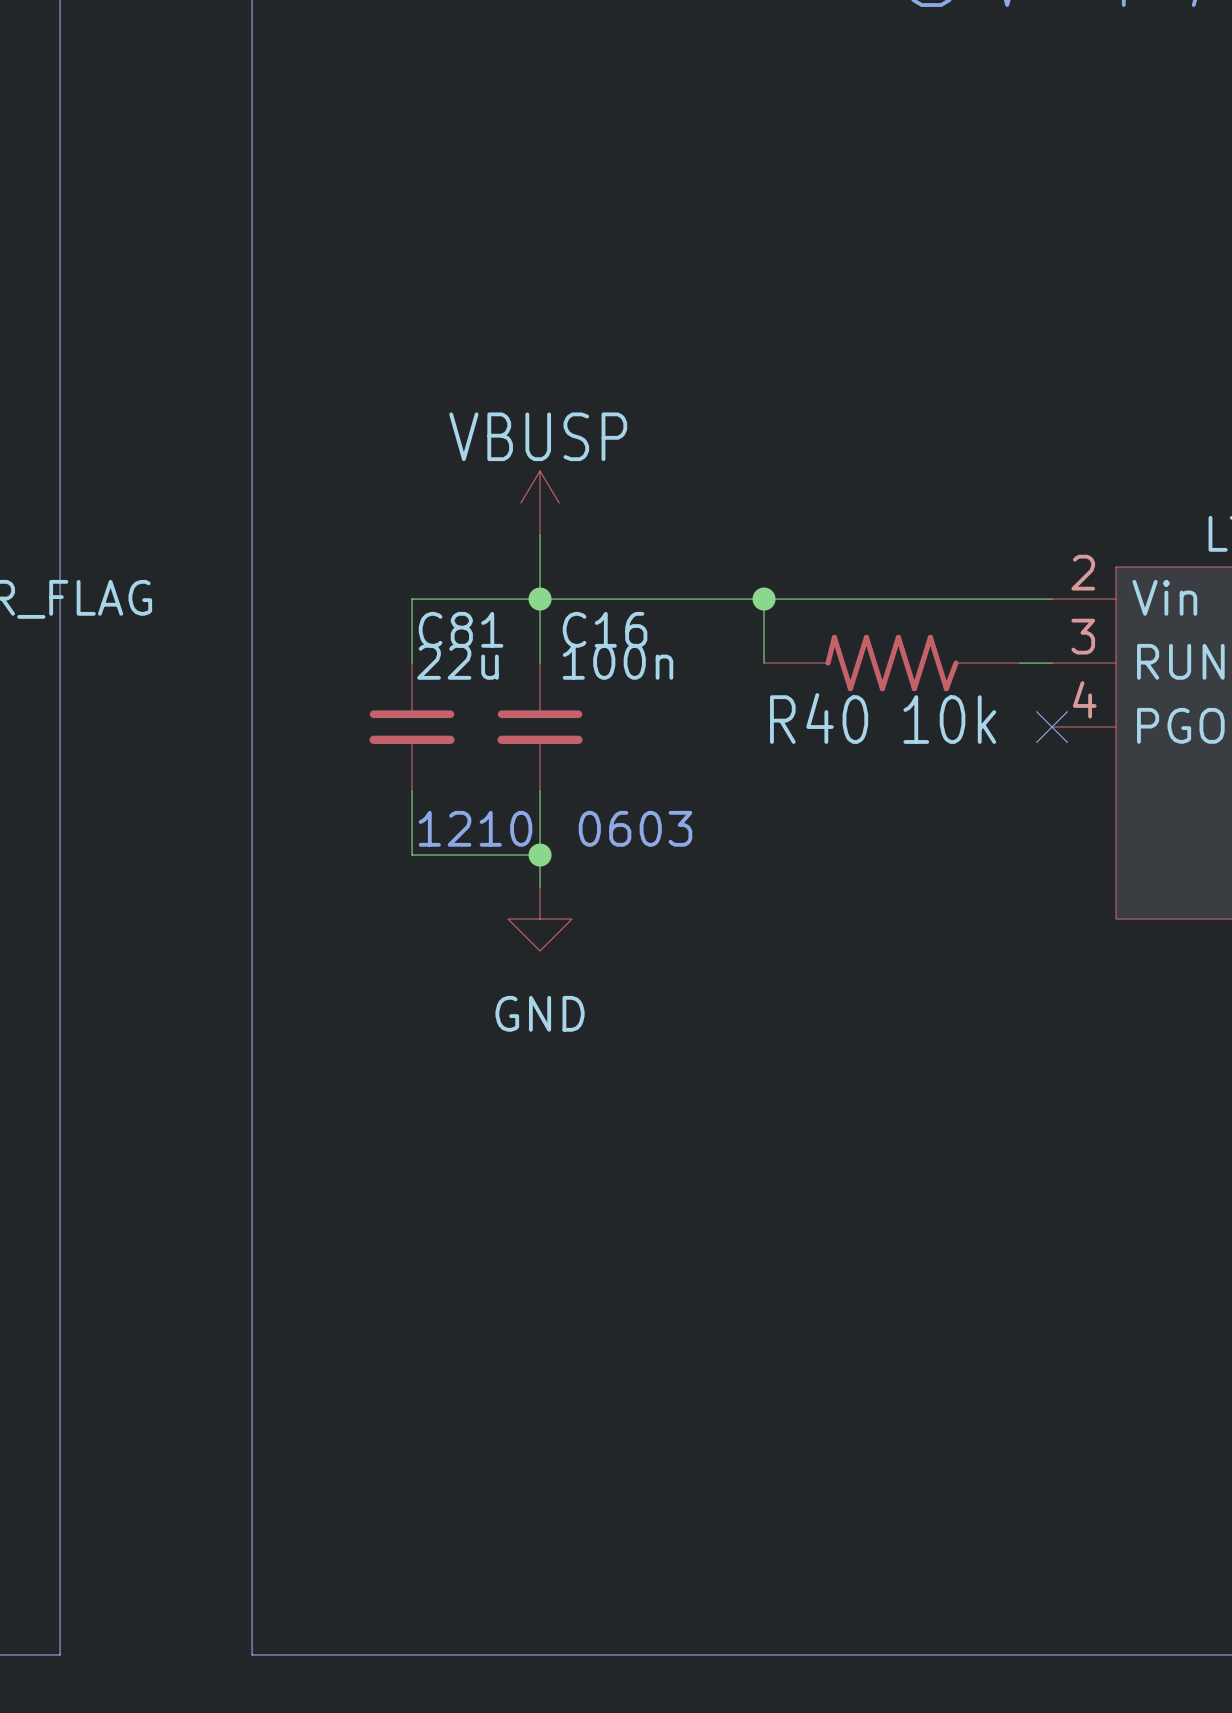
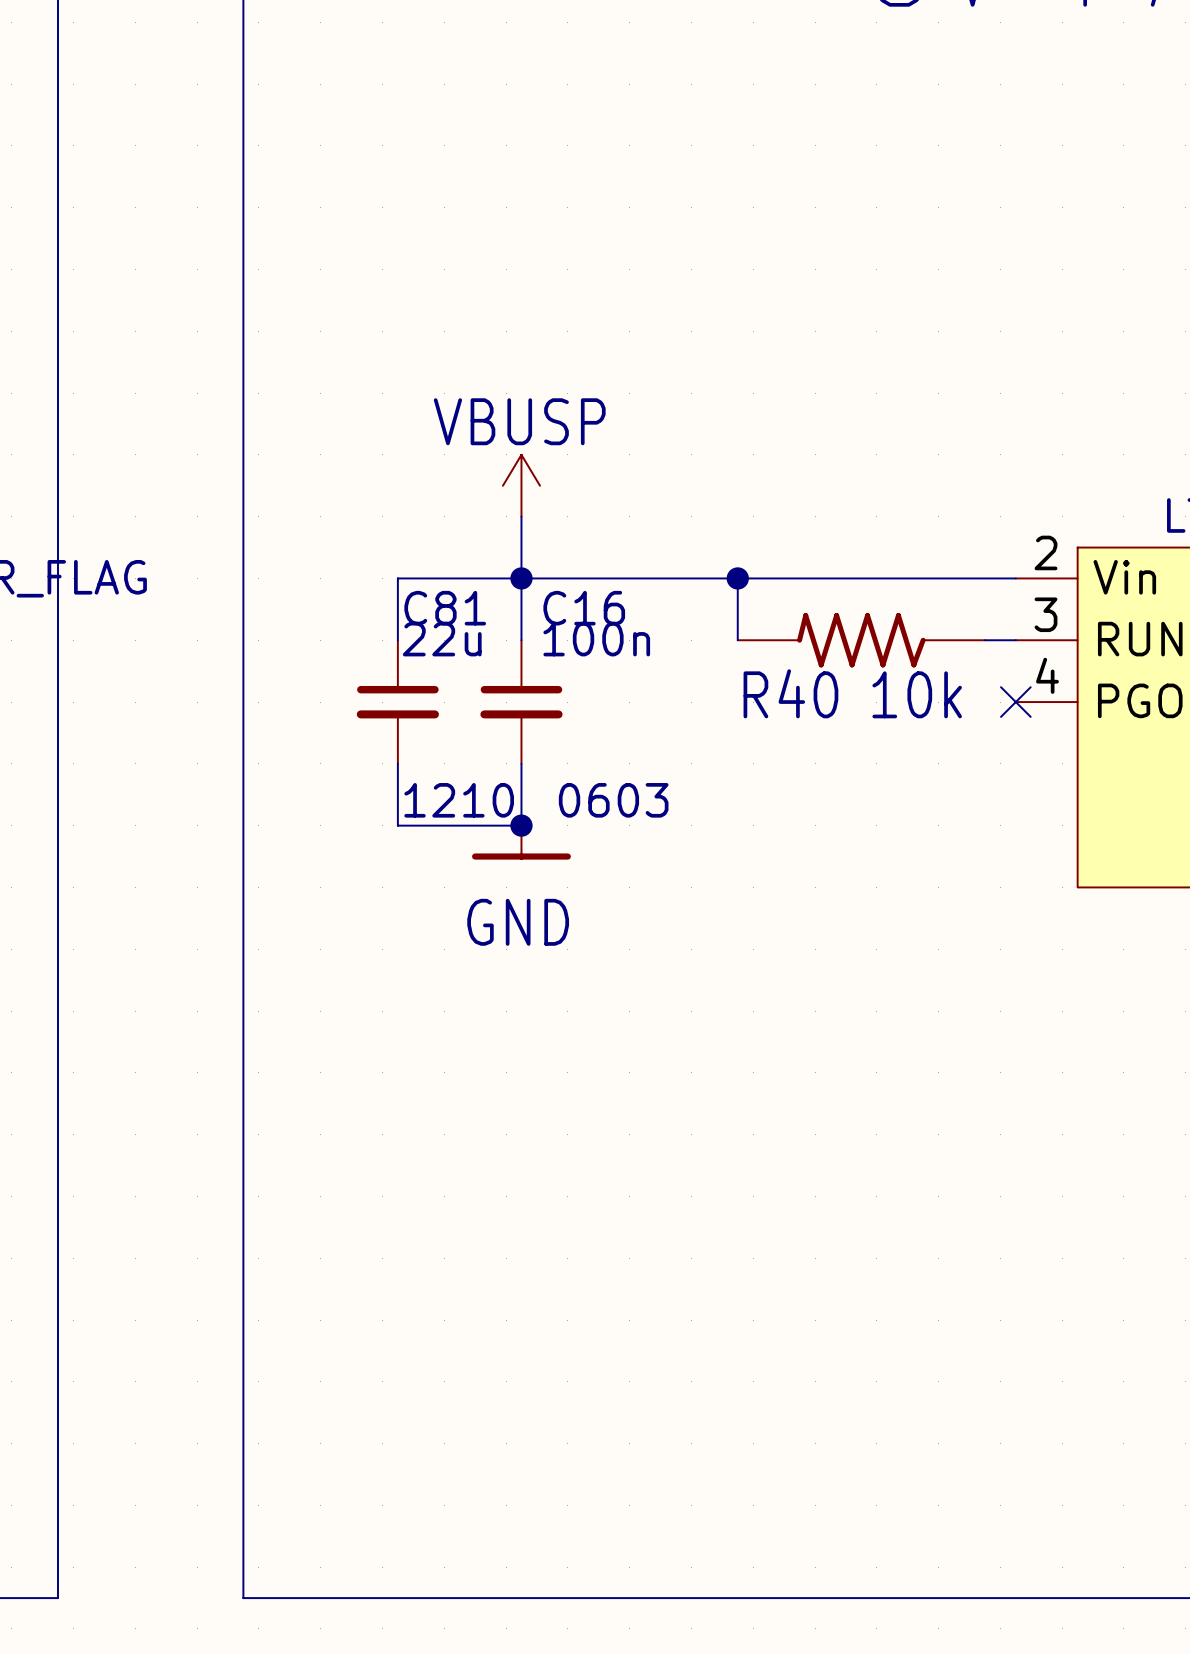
power symbol: none -> GND (521, 842)
power symbol: GND (540, 919) -> none

